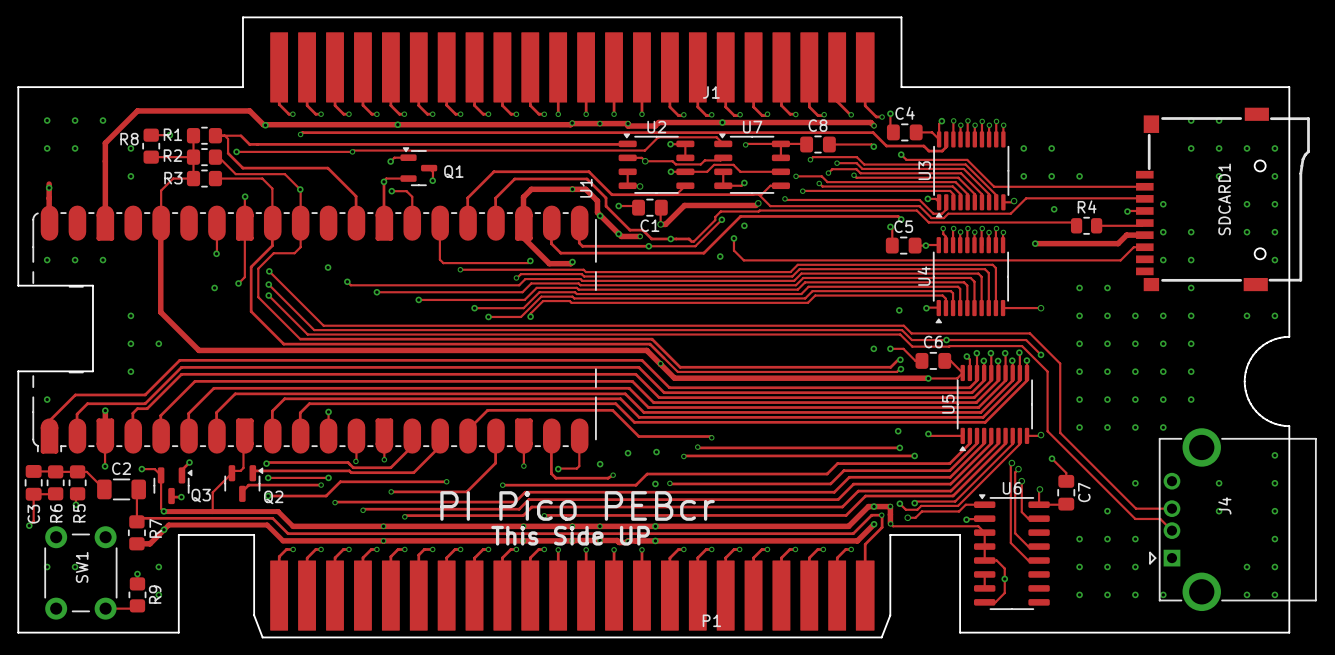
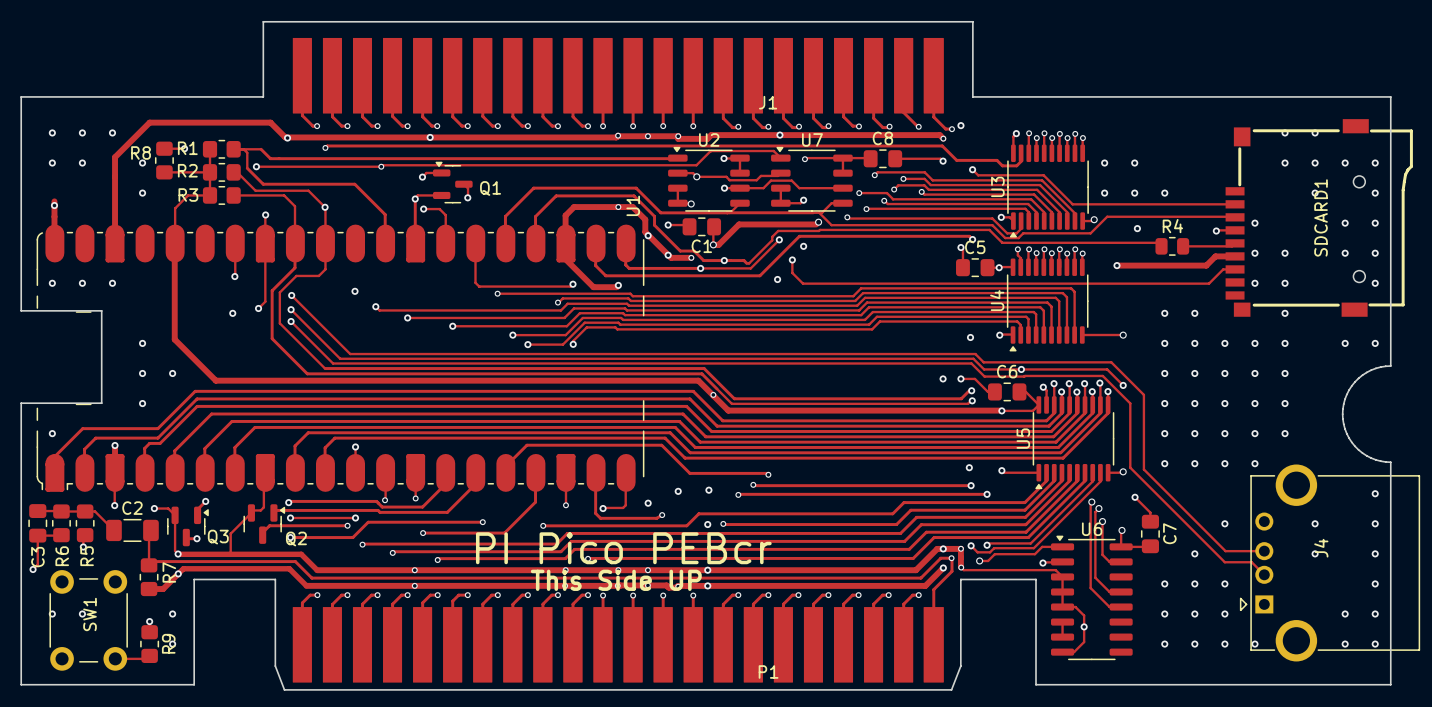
track: (890, 113) (890, 129) (893, 132) -> none
C4: (904, 132) -> none
track: (916, 132) (932, 132) (939, 139) -> none

